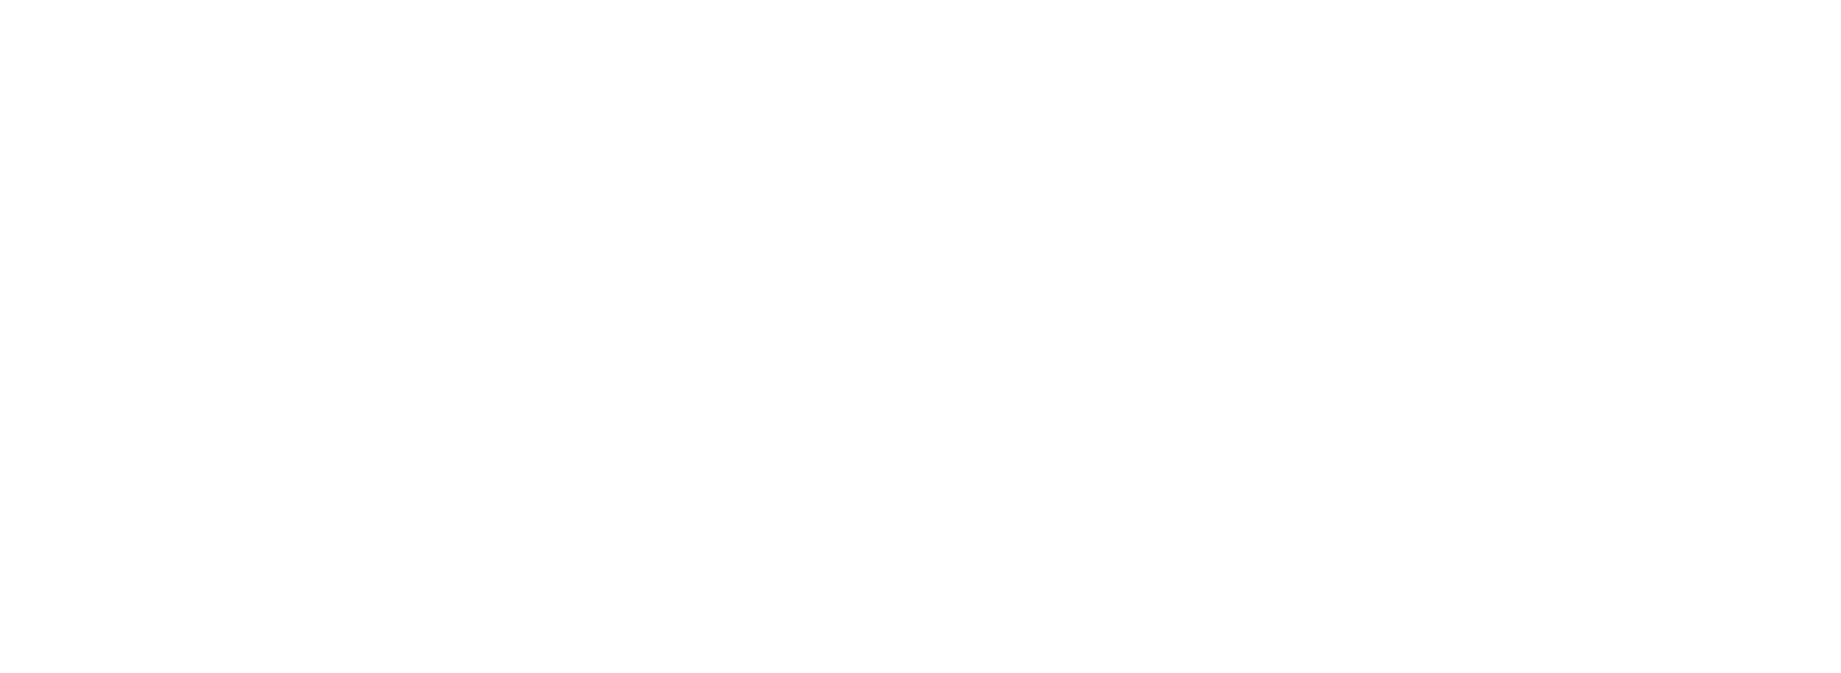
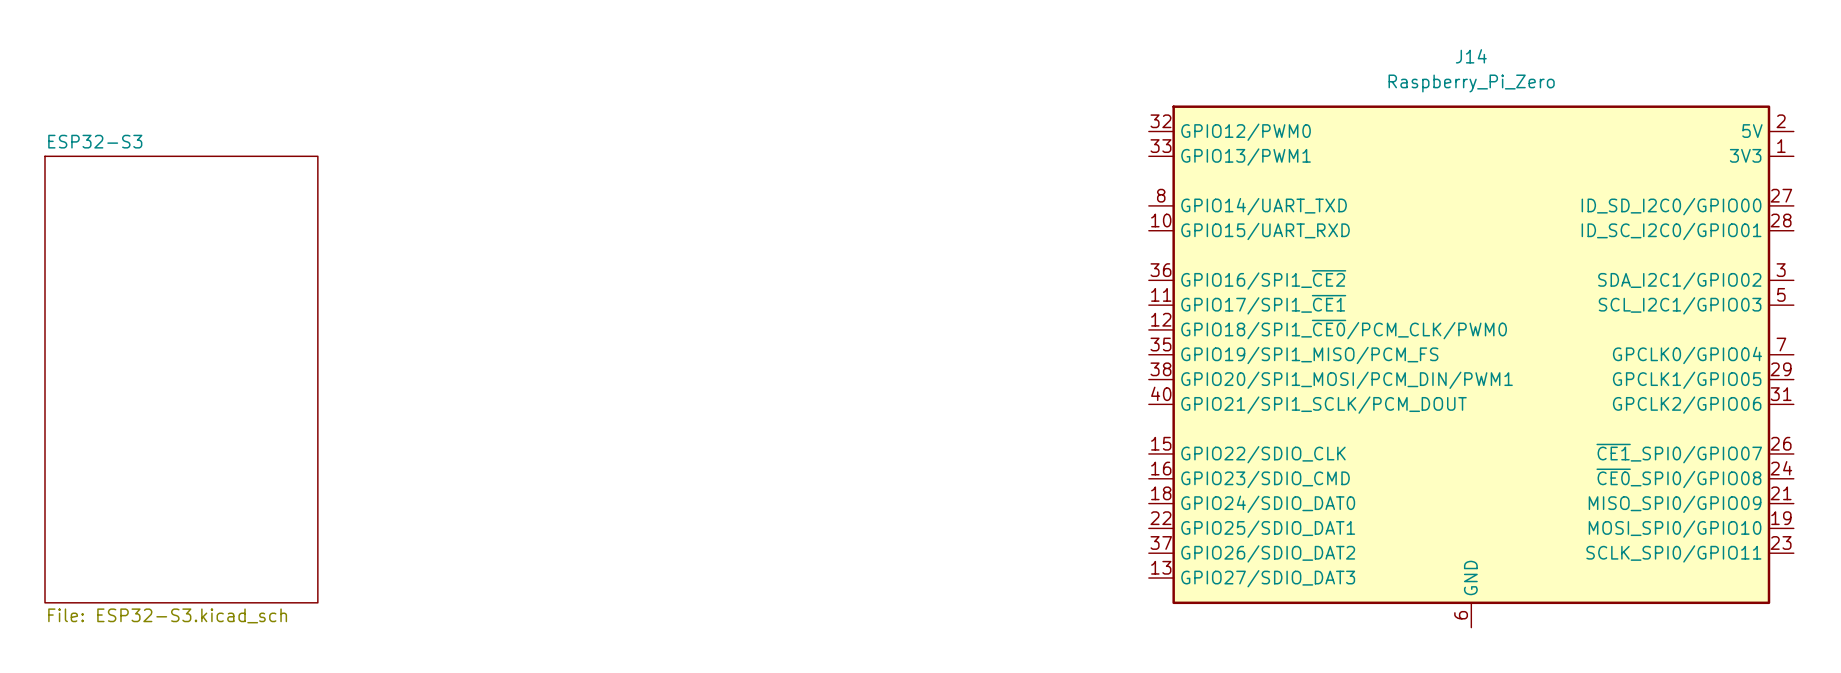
J14: none -> Raspberry_Pi_Zero (1471, 366)
sheet ESP32-S3: none -> File: ESP32-S3.kicad_sch (181, 379)

